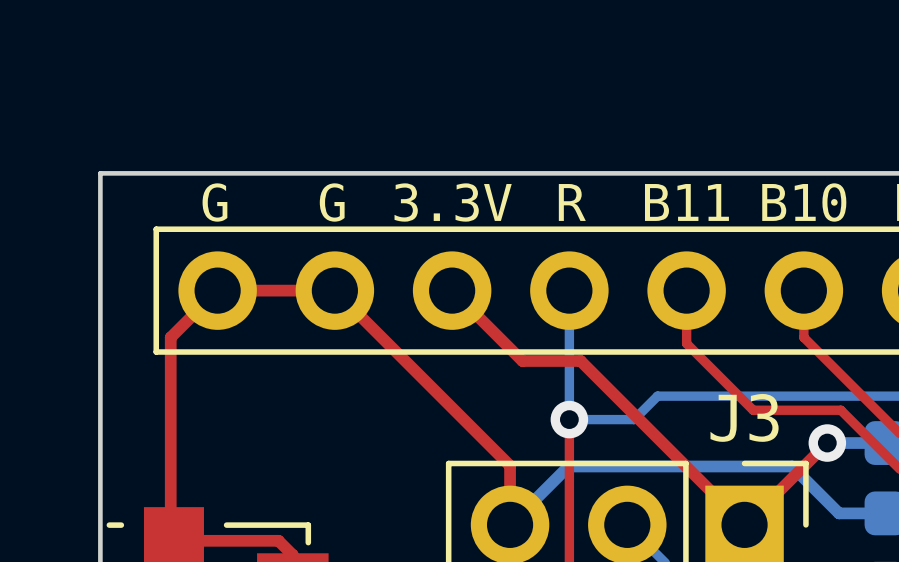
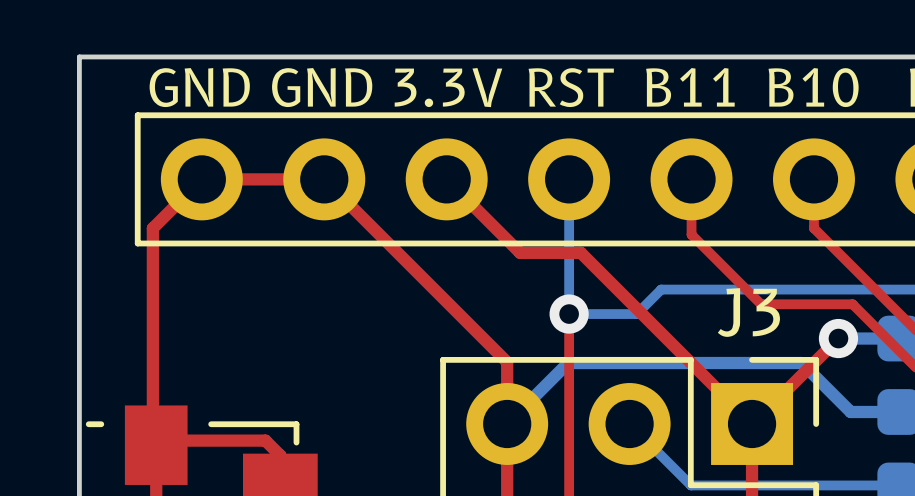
text: G (214, 202) -> GND (199, 87)
text: G (332, 202) -> GND (322, 87)
text: R (572, 202) -> RST (571, 87)

